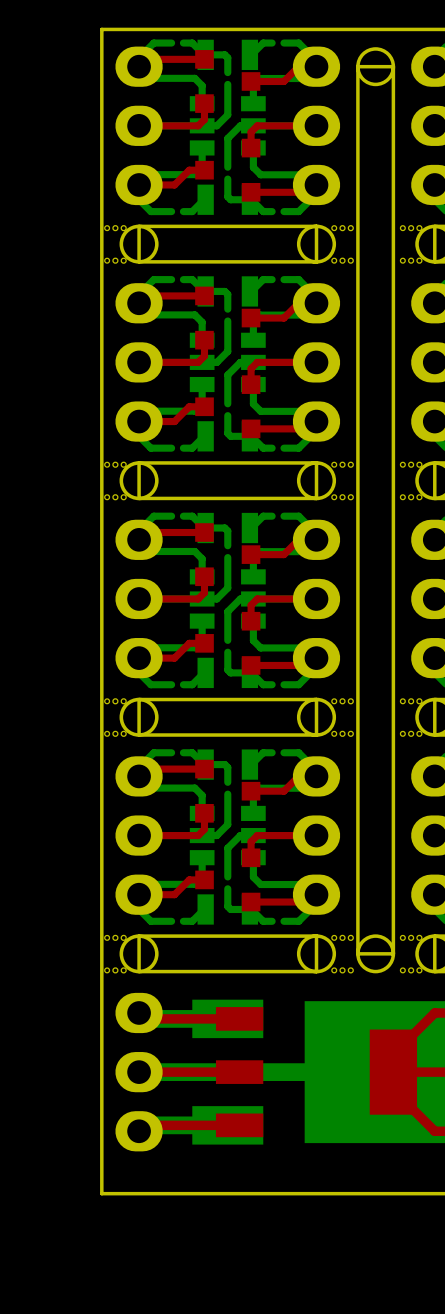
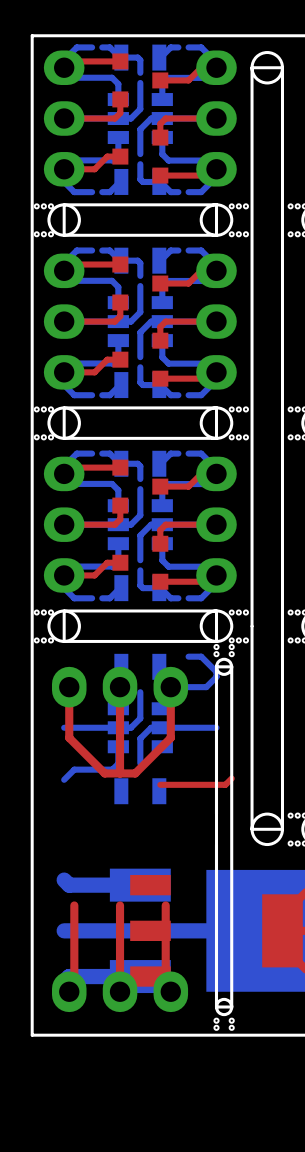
round board edge: none -> [213, 644, 220, 650]
round board edge: none -> [229, 644, 235, 650]
round board edge: none -> [213, 651, 220, 657]
round board edge: none -> [229, 651, 235, 657]
bottom track: (171, 752) (153, 752) (139, 767) (139, 776) (150, 788) (194, 788) (202, 795) (202, 813) -> none
bottom track: (183, 752) (192, 752) (204, 764) (224, 764) (227, 767) (227, 782) -> none
bottom track: (272, 752) (263, 752) (249, 764) -> none
round board edge: none -> [215, 657, 234, 676]
top track: (204, 769) (146, 769) (139, 776) -> none
top track: (334, 776) (298, 776) (283, 791) (251, 791) -> none
top track: none -> (69, 687) (69, 737) (104, 773) (135, 773) (170, 737) (170, 687)
top track: none -> (120, 687) (120, 773)
part: none -> (120, 687)
part: (227, 791) -> none
top track: (204, 813) (204, 829) (198, 835) (139, 835) -> none
part: (139, 835) -> none
part: (316, 835) -> none
top track: (334, 835) (257, 835) (251, 841) (251, 857) -> none
bottom track: (253, 859) (253, 877) (260, 884) (304, 884) (316, 896) -> none
top track: (204, 879) (189, 879) (174, 894) (139, 894) -> none
part: (227, 879) -> none
bottom track: (227, 888) (227, 906) (230, 909) (251, 909) (263, 921) (272, 921) -> none
bottom track: (139, 894) (139, 909) (150, 921) (171, 921) -> none
bottom track: (316, 894) (316, 903) (298, 921) (283, 921) -> none
bottom track: (205, 909) (192, 921) (183, 921) -> none
round board edge: [104, 934, 111, 941] -> none
round board edge: [112, 934, 119, 941] -> none
round board edge: [119, 934, 159, 974] -> none
round board edge: [120, 934, 127, 941] -> none
round board edge: [296, 934, 337, 974] -> none
round board edge: [331, 934, 338, 941] -> none
round board edge: [339, 934, 346, 941] -> none
round board edge: [347, 934, 354, 941] -> none
board edge: (316, 936) (139, 936) (139, 971) (316, 971) -> (216, 814) (216, 666) (231, 666) (231, 1007) (216, 1007) (216, 844)
round board edge: [104, 967, 111, 974] -> none
round board edge: [112, 967, 119, 974] -> none
round board edge: [120, 967, 127, 974] -> none
round board edge: [331, 967, 338, 974] -> none
round board edge: [339, 967, 346, 974] -> none
round board edge: [347, 967, 354, 974] -> none
top track: (139, 1012) (144, 1018) (239, 1018) -> none
top track: none -> (74, 905) (74, 986) (69, 991)
top track: none -> (120, 905) (120, 991)
top track: none -> (165, 905) (165, 986) (170, 991)
top track: (139, 1072) (239, 1072) -> none
part rotation: 0° (139, 1072) -> 90° clockwise (120, 991)
part position: (139, 1072) -> (120, 991)
top track: (239, 1125) (144, 1125) (139, 1131) -> none
round board edge: none -> [214, 997, 234, 1017]
round board edge: none -> [213, 1018, 220, 1024]
round board edge: none -> [229, 1018, 235, 1024]
round board edge: none -> [213, 1025, 220, 1031]
round board edge: none -> [229, 1025, 235, 1031]

